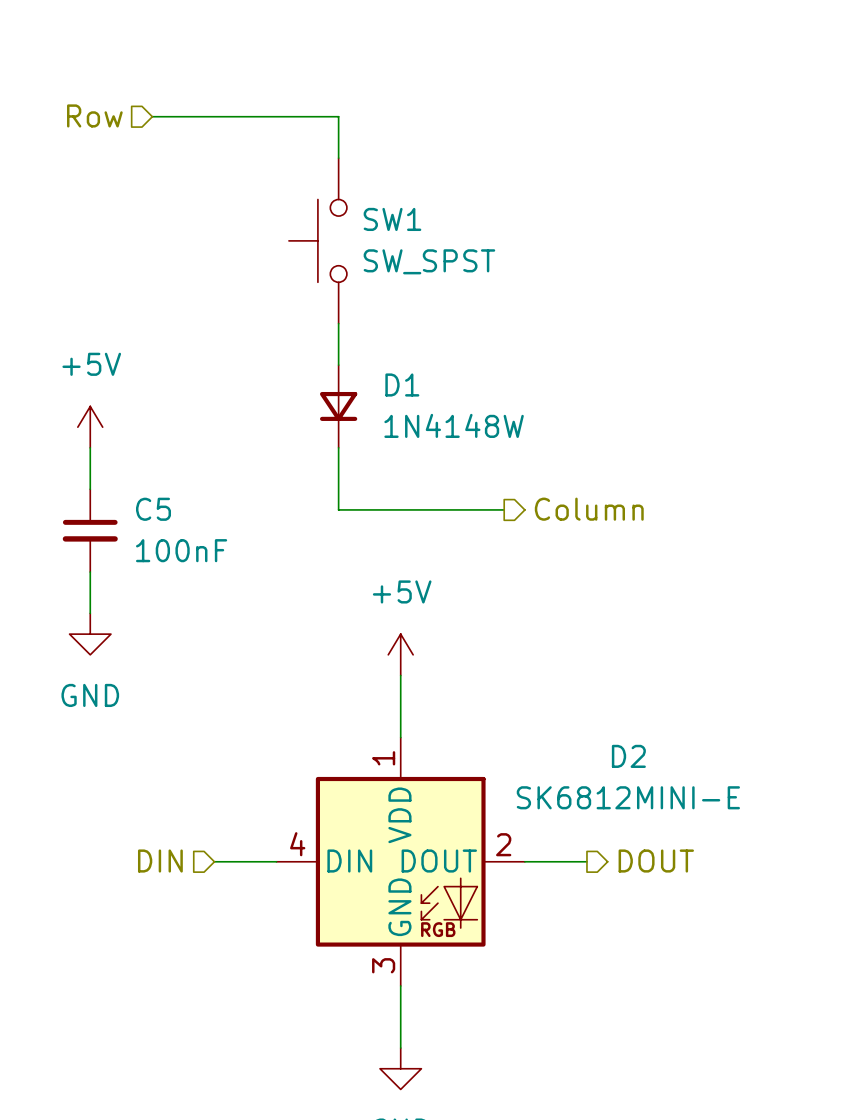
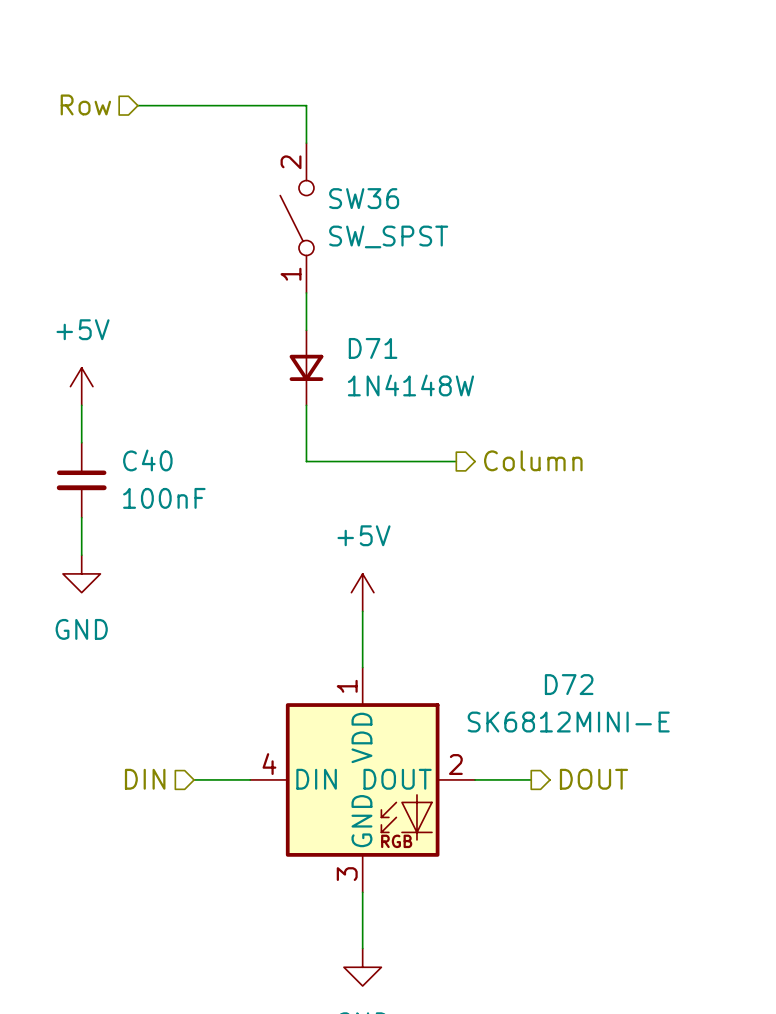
SW1: SW_SPST (317, 240) -> none
SW36: none -> SW_SPST (297, 218)
D1 name: D1 (402, 385) -> D71 (373, 348)
C5 name: C5 (153, 509) -> C40 (147, 460)
D2 name: D2 (628, 756) -> D72 (569, 684)

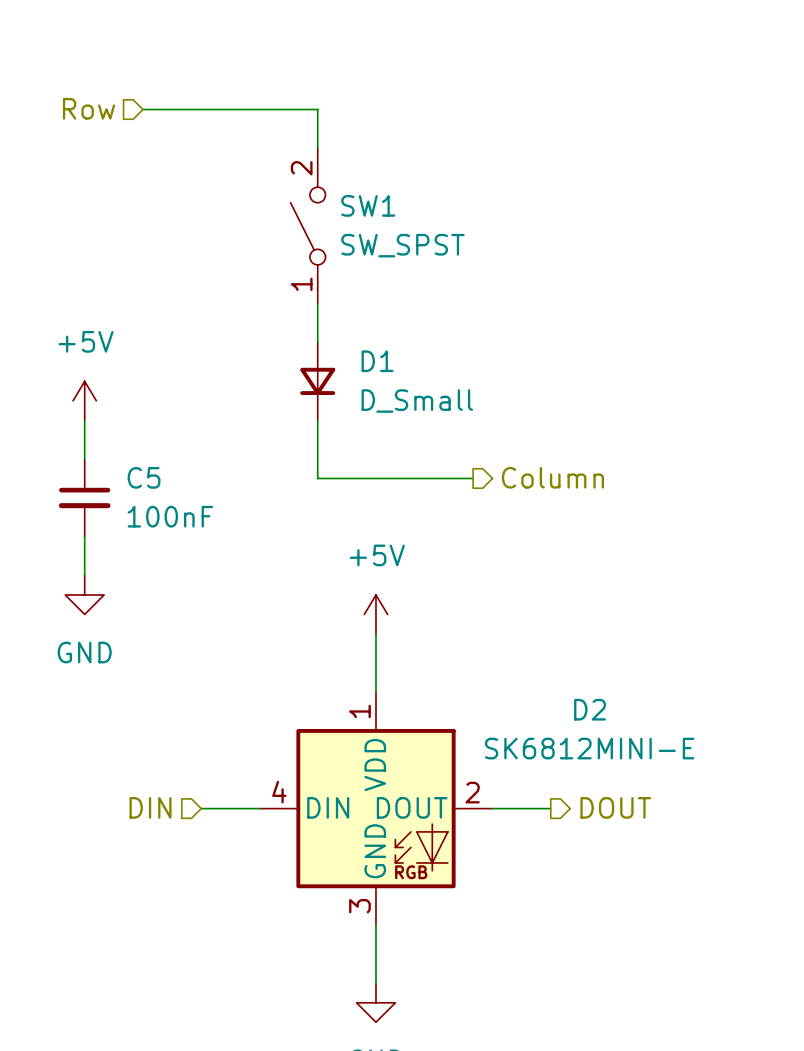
SW36 name: SW36 (364, 198) -> SW1 (368, 205)
D71 name: D71 (373, 348) -> D1 (377, 361)
D71 value: 1N4148W (410, 385) -> D_Small (417, 401)
C40 name: C40 (147, 460) -> C5 (144, 477)
D72 name: D72 (569, 684) -> D2 (590, 709)

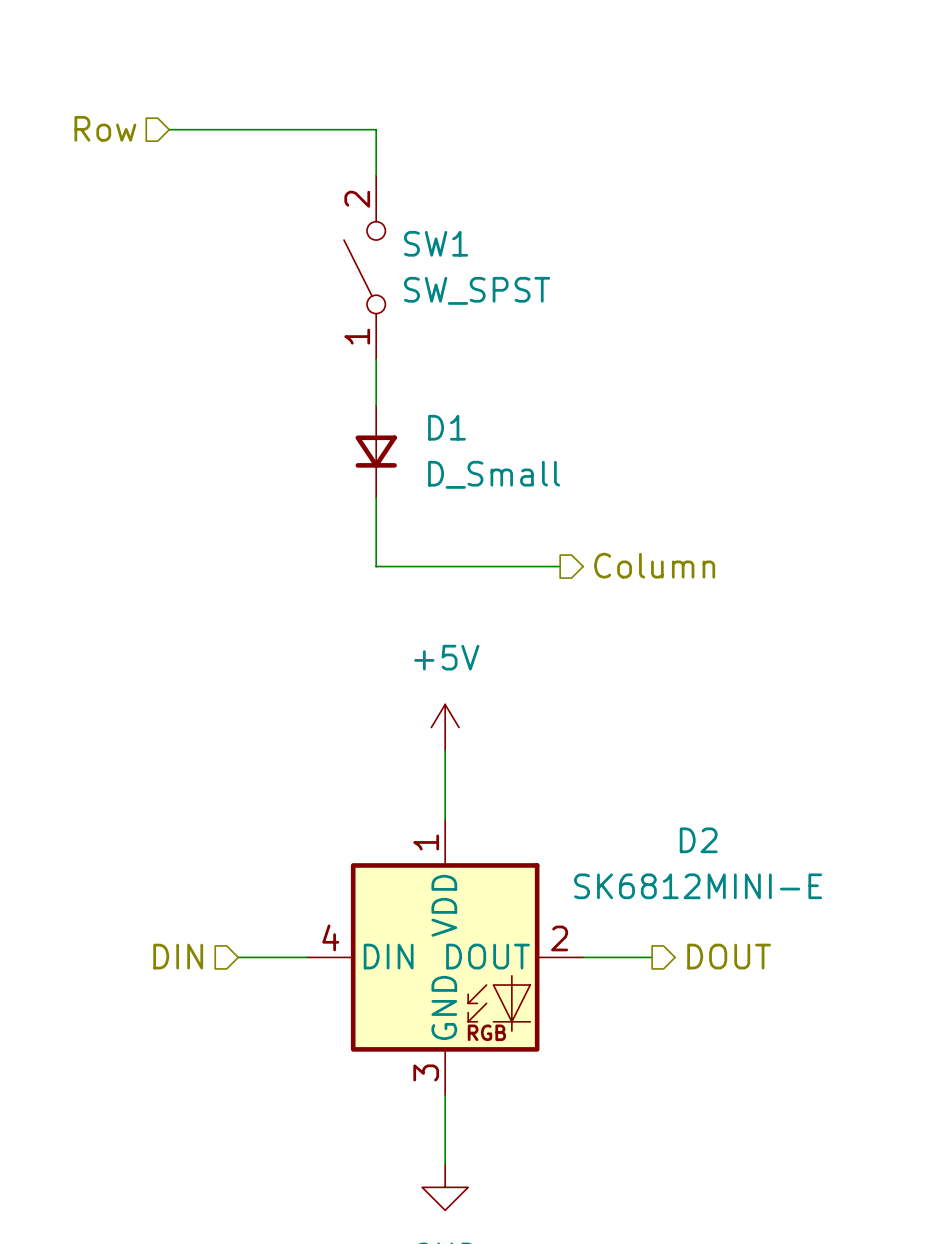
power symbol: +5V (84, 400) -> none
wire: (84, 420) (84, 459) -> none
C5: 100nF (84, 497) -> none
wire: (84, 536) (84, 575) -> none
power symbol: GND (84, 595) -> none

